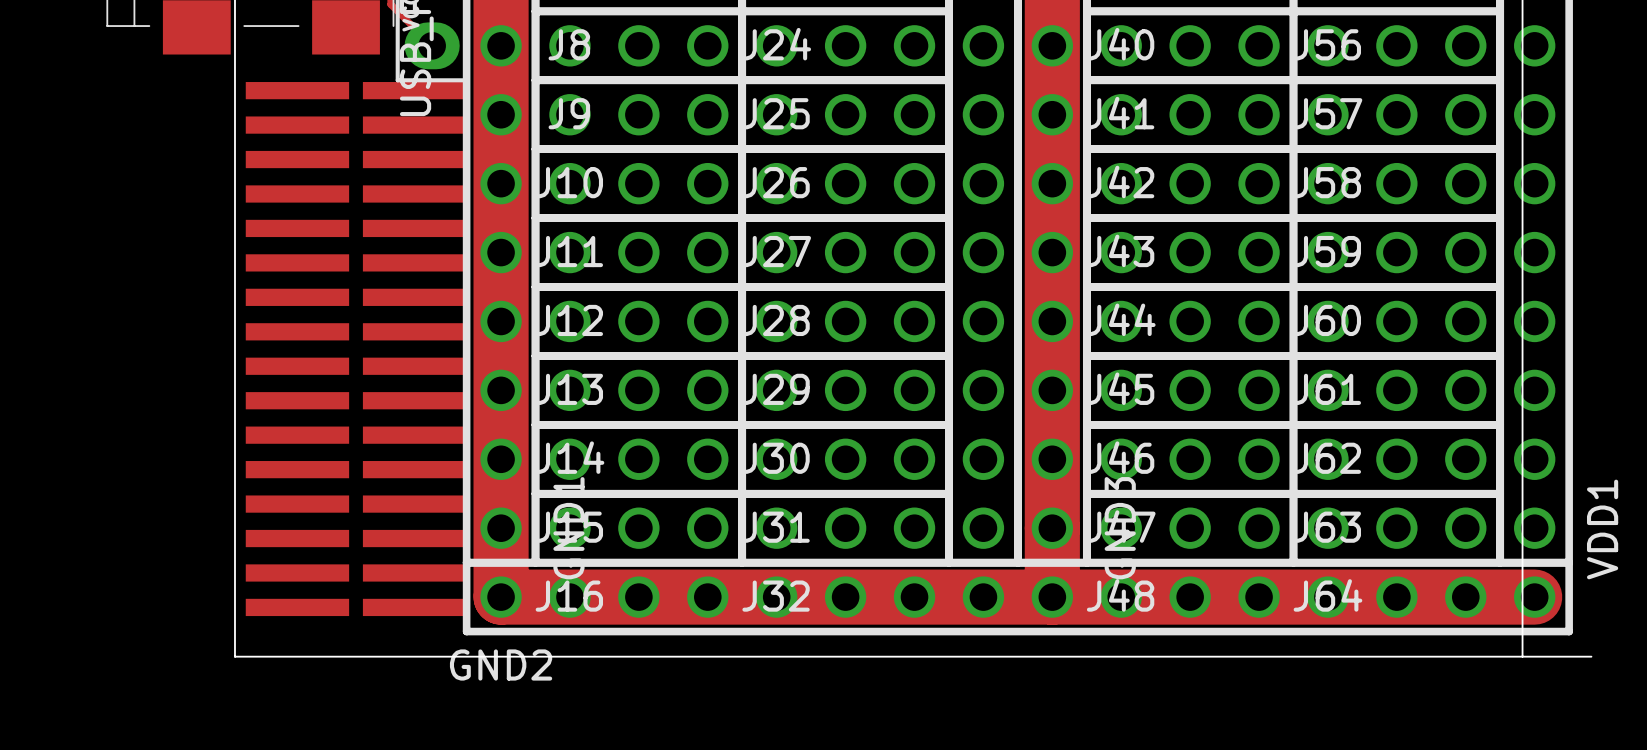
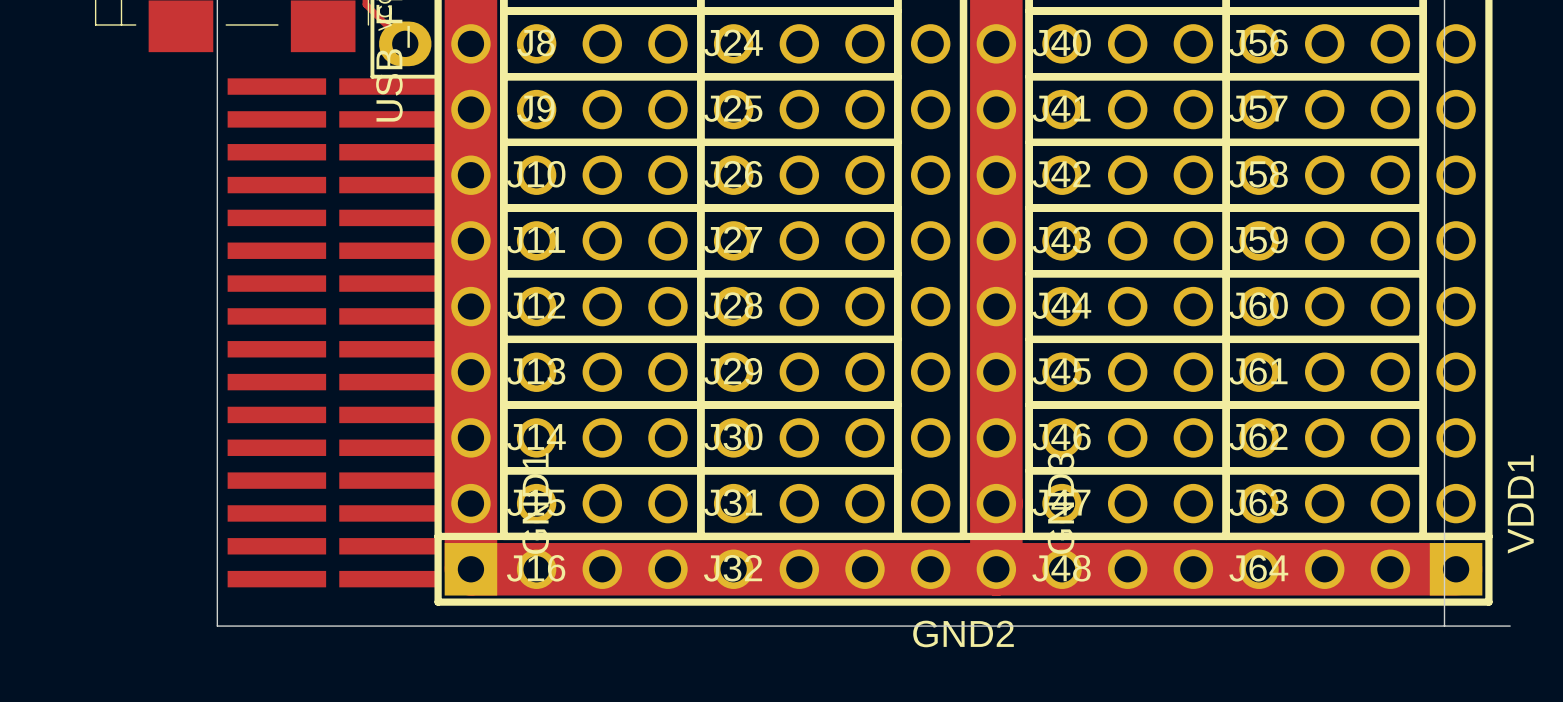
GND2 footprint: [462, 558, 1573, 636] -> [434, 532, 1493, 606]
GND2 name position: GND2 (501, 664) -> GND2 (963, 633)

